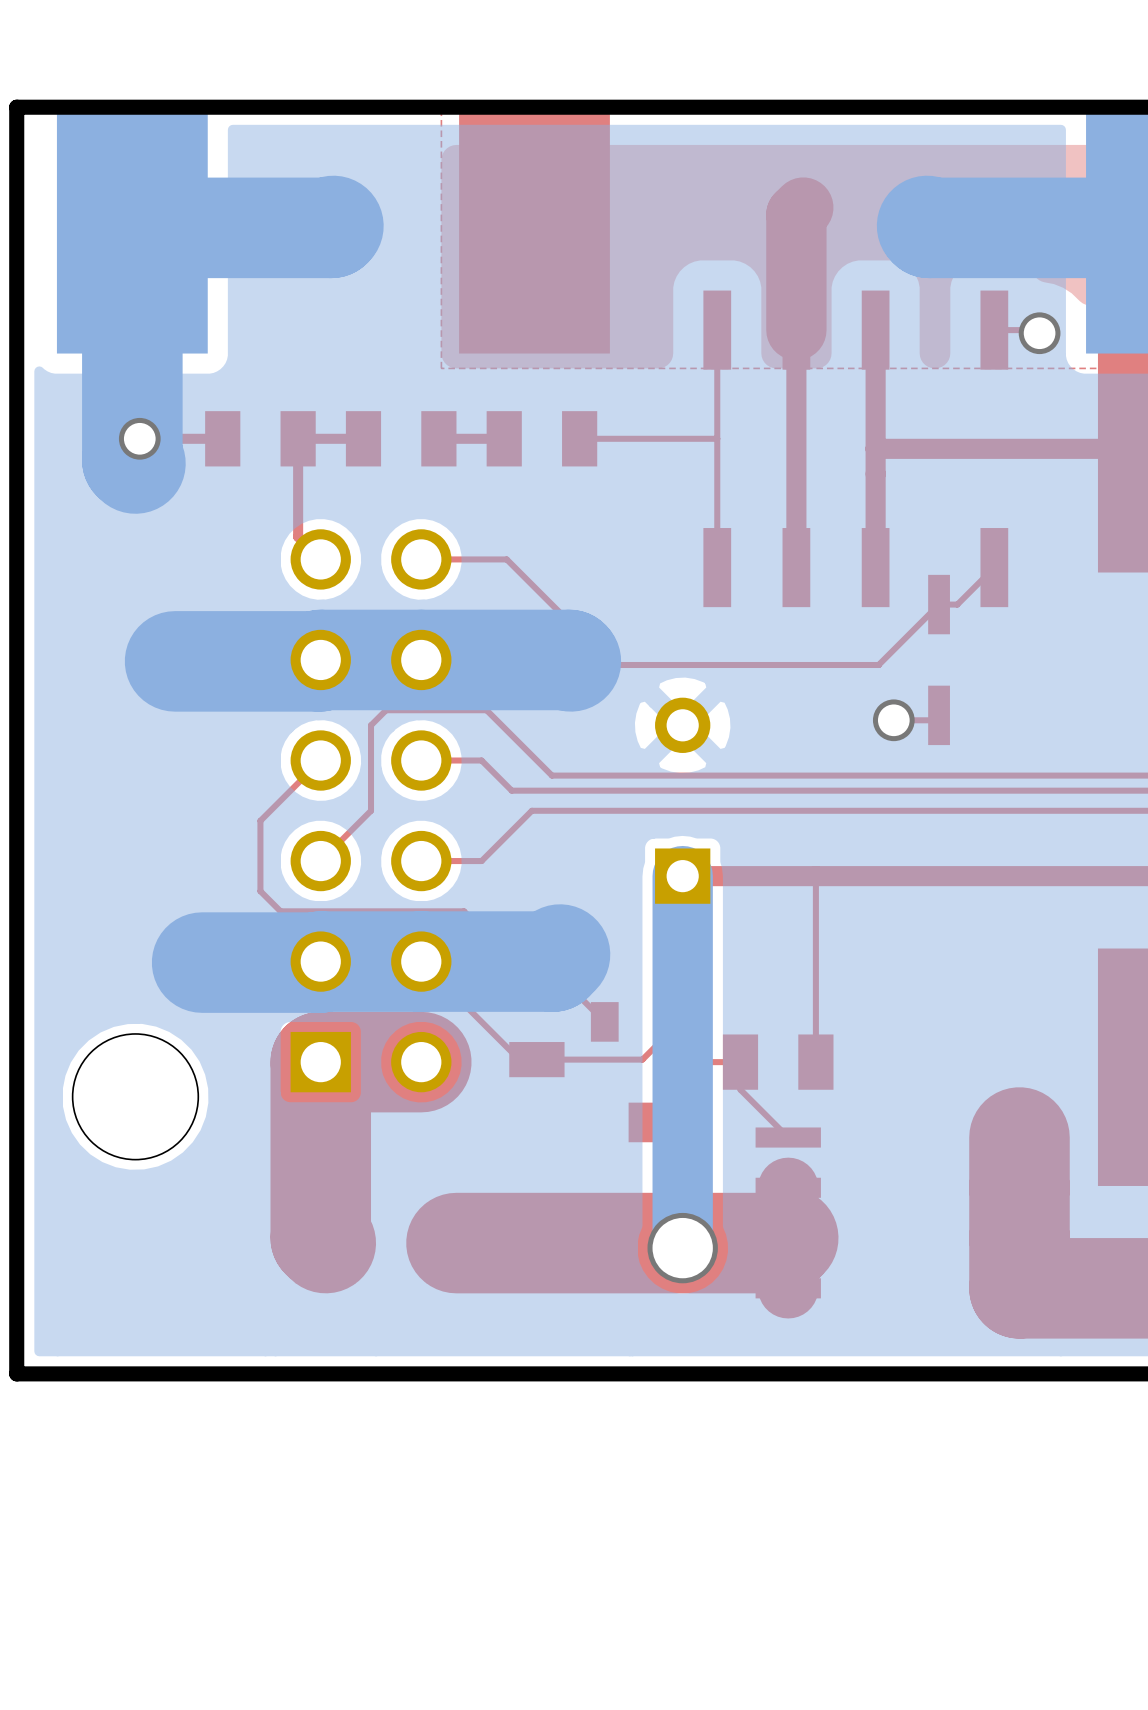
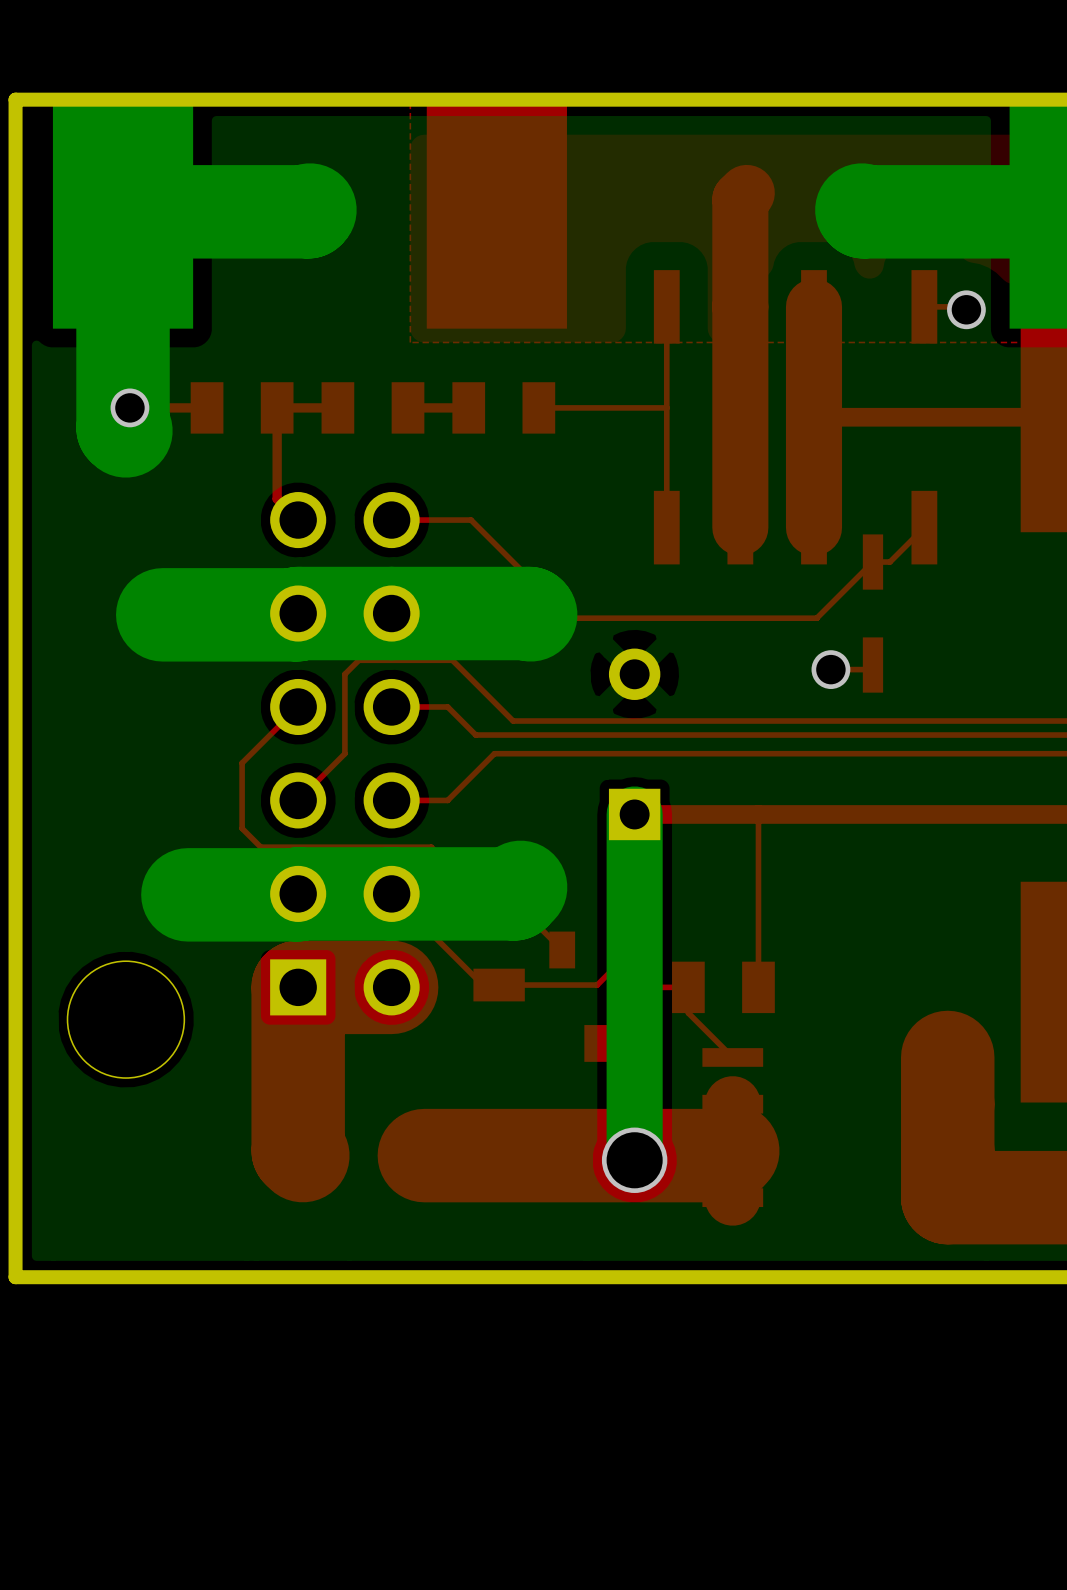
top track width: thin (796, 330) (796, 567) -> thick (740, 306) (740, 527)
top track width: thin (875, 330) (875, 567) -> thick (813, 306) (813, 527)

